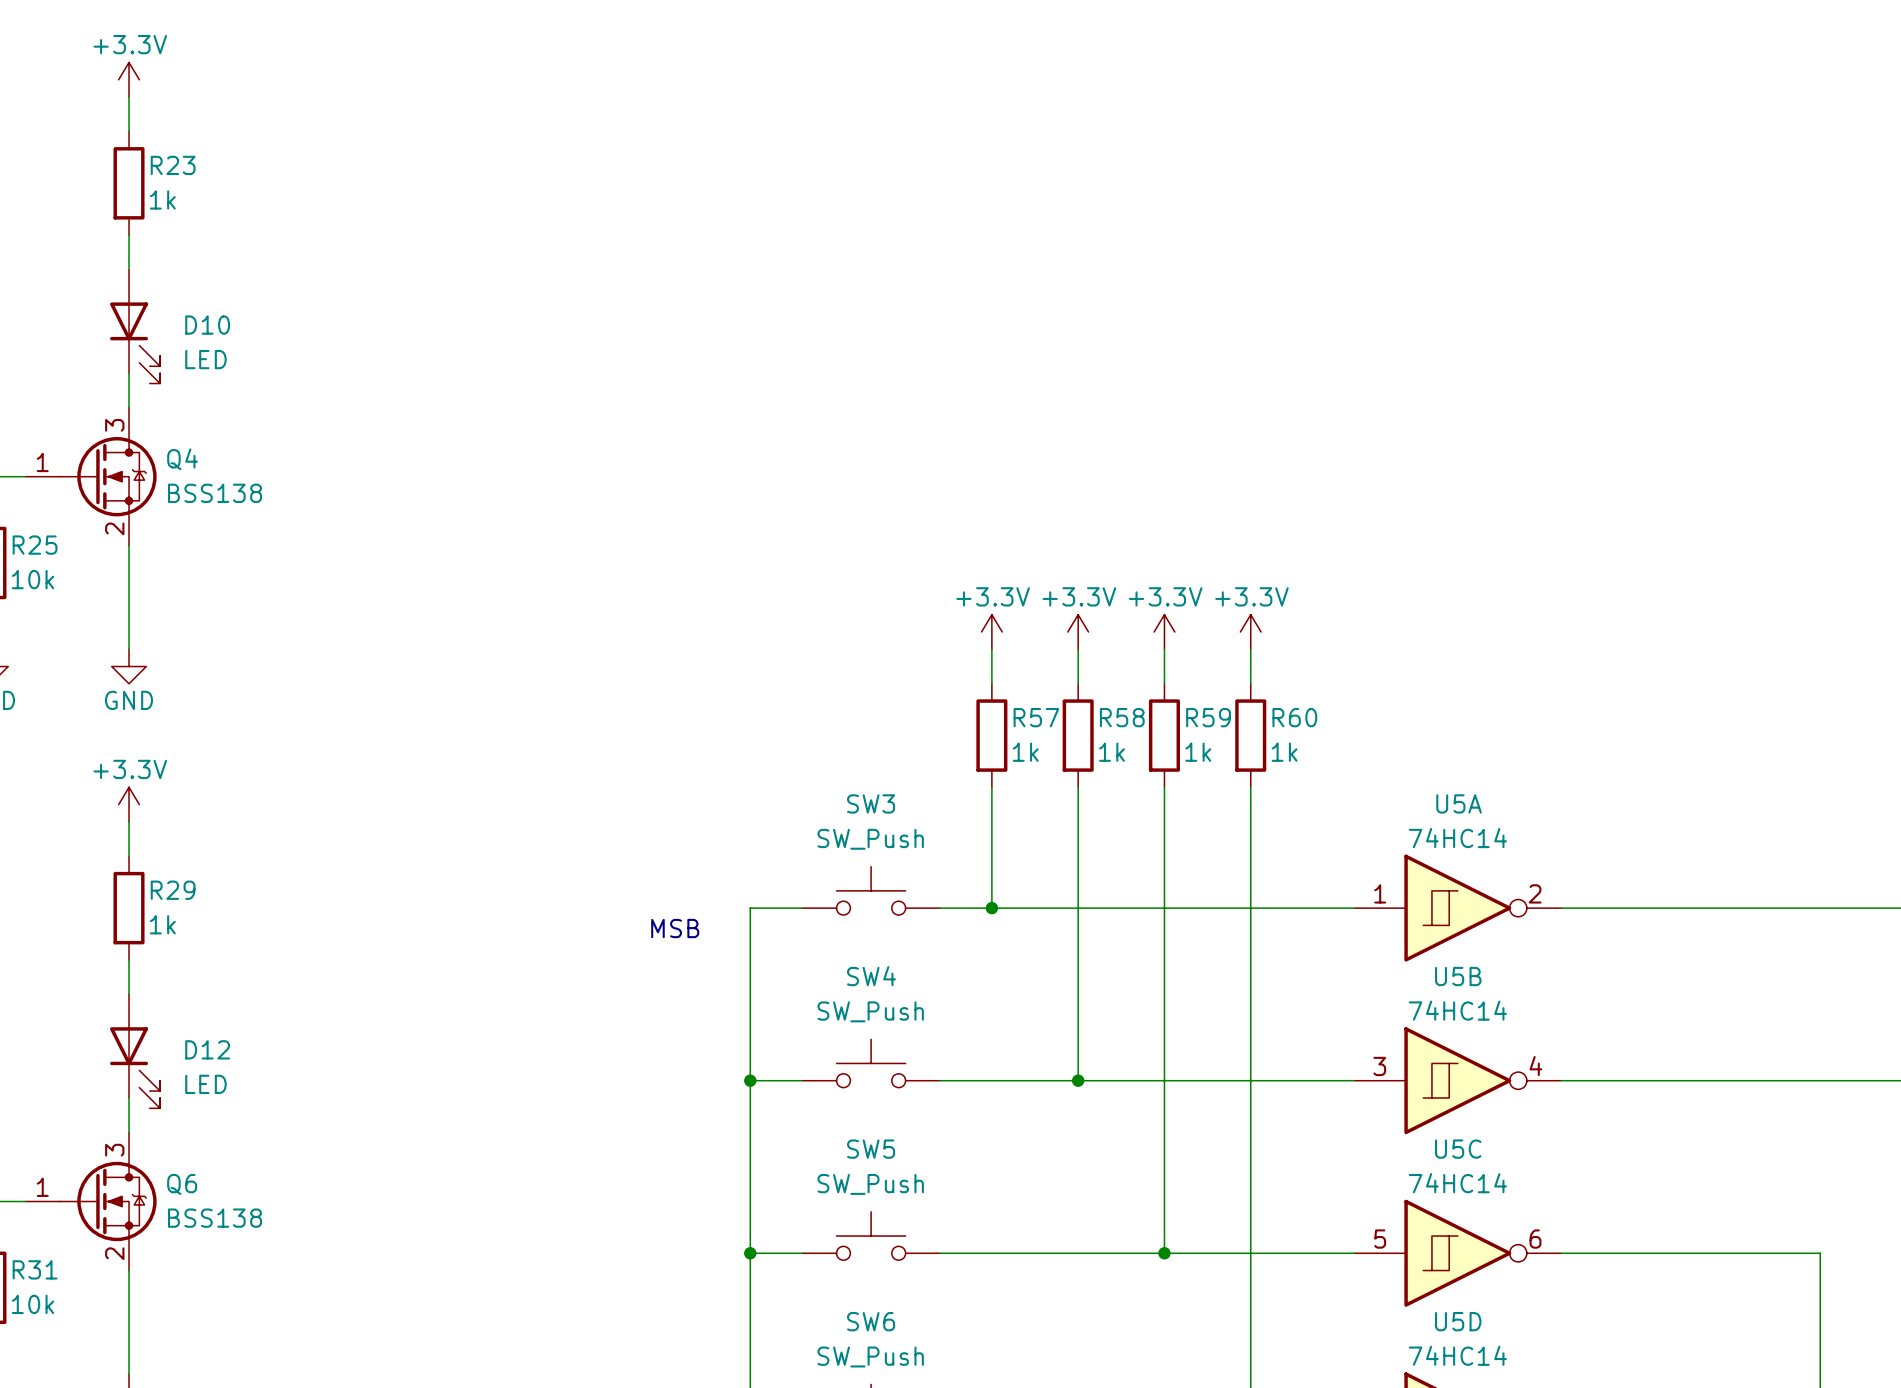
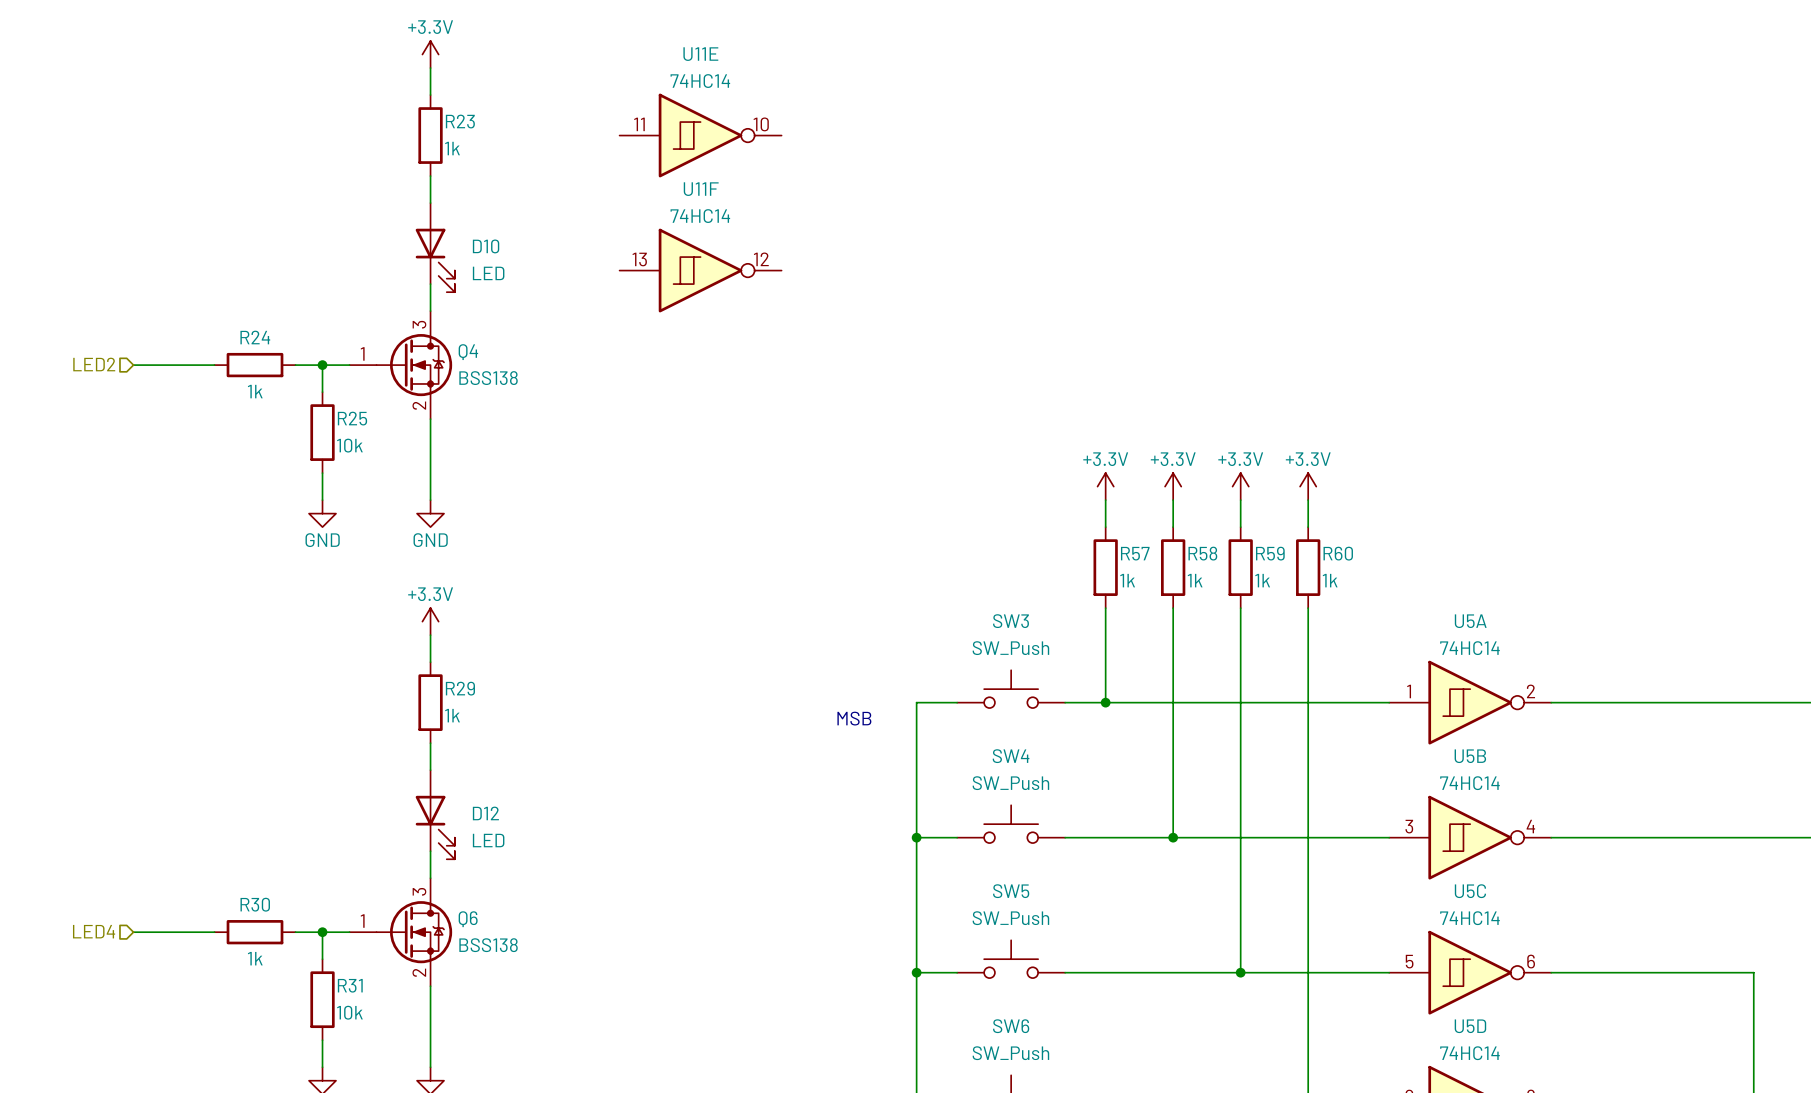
U11E: none -> 74HC14 (700, 135)
U11F: none -> 74HC14 (700, 270)

